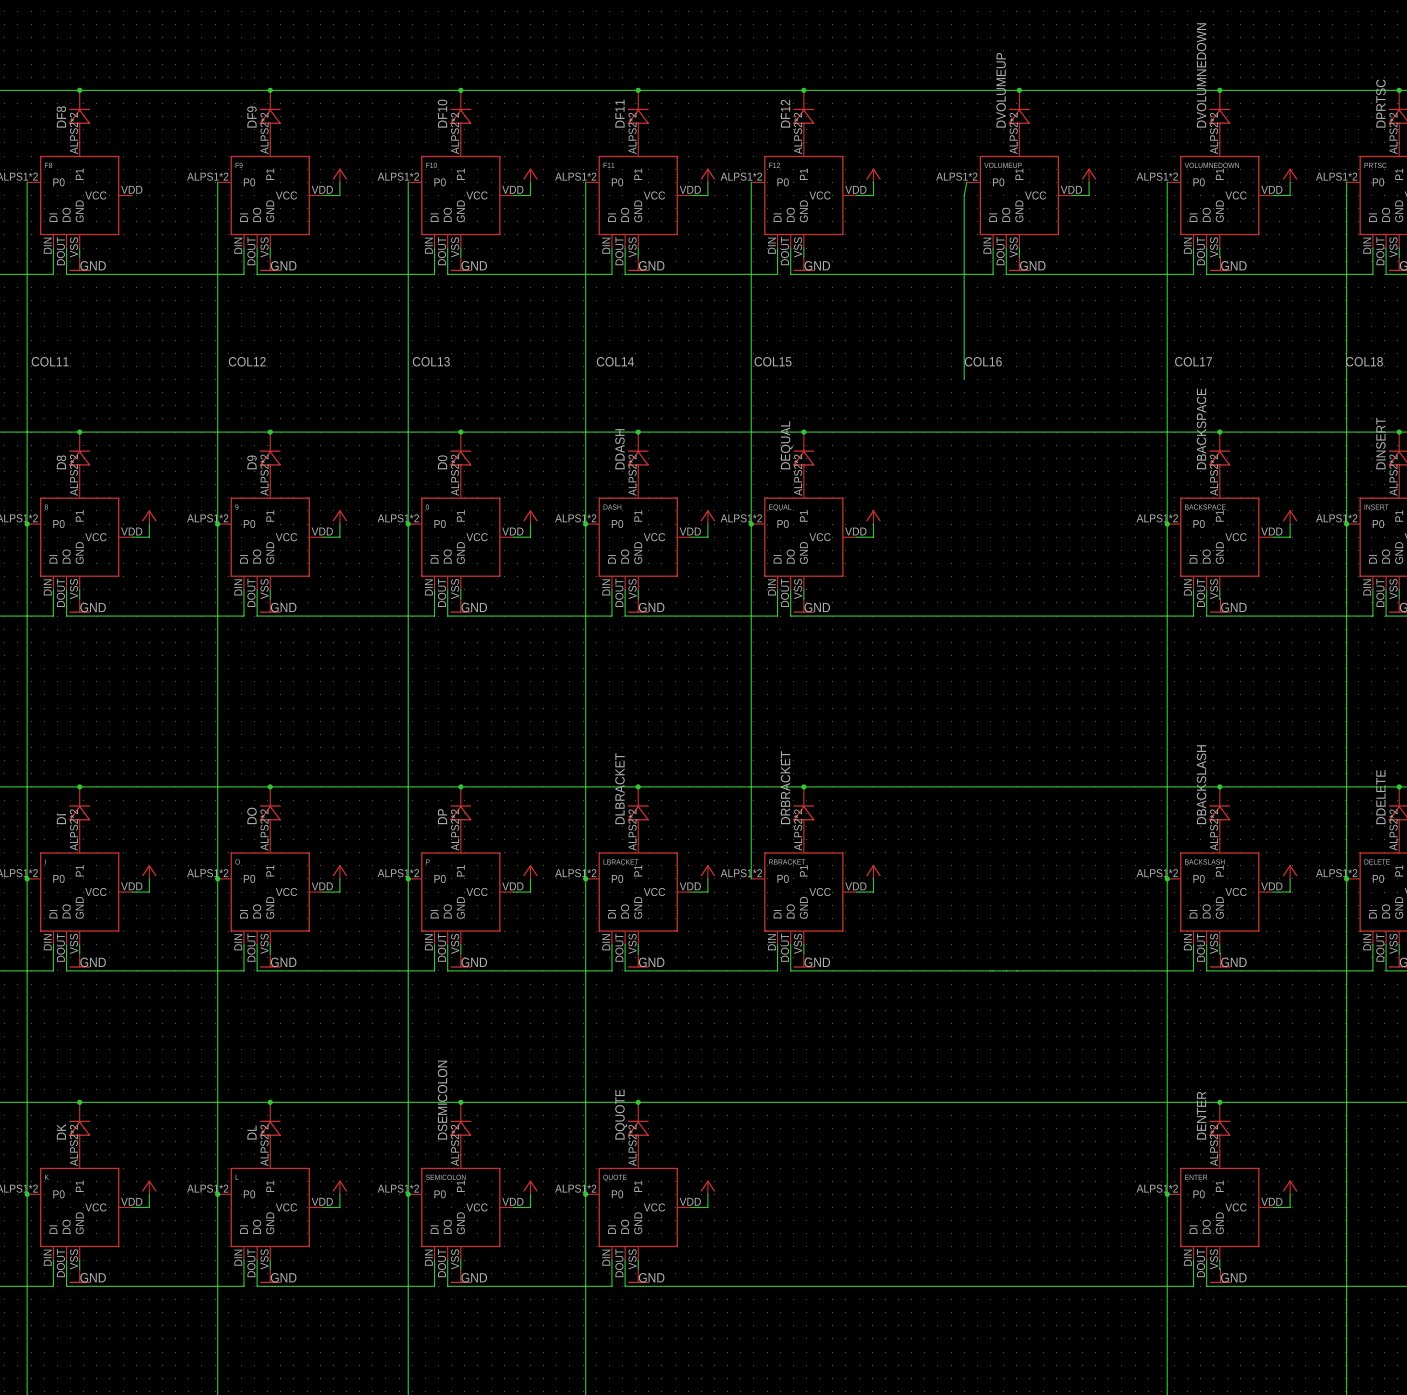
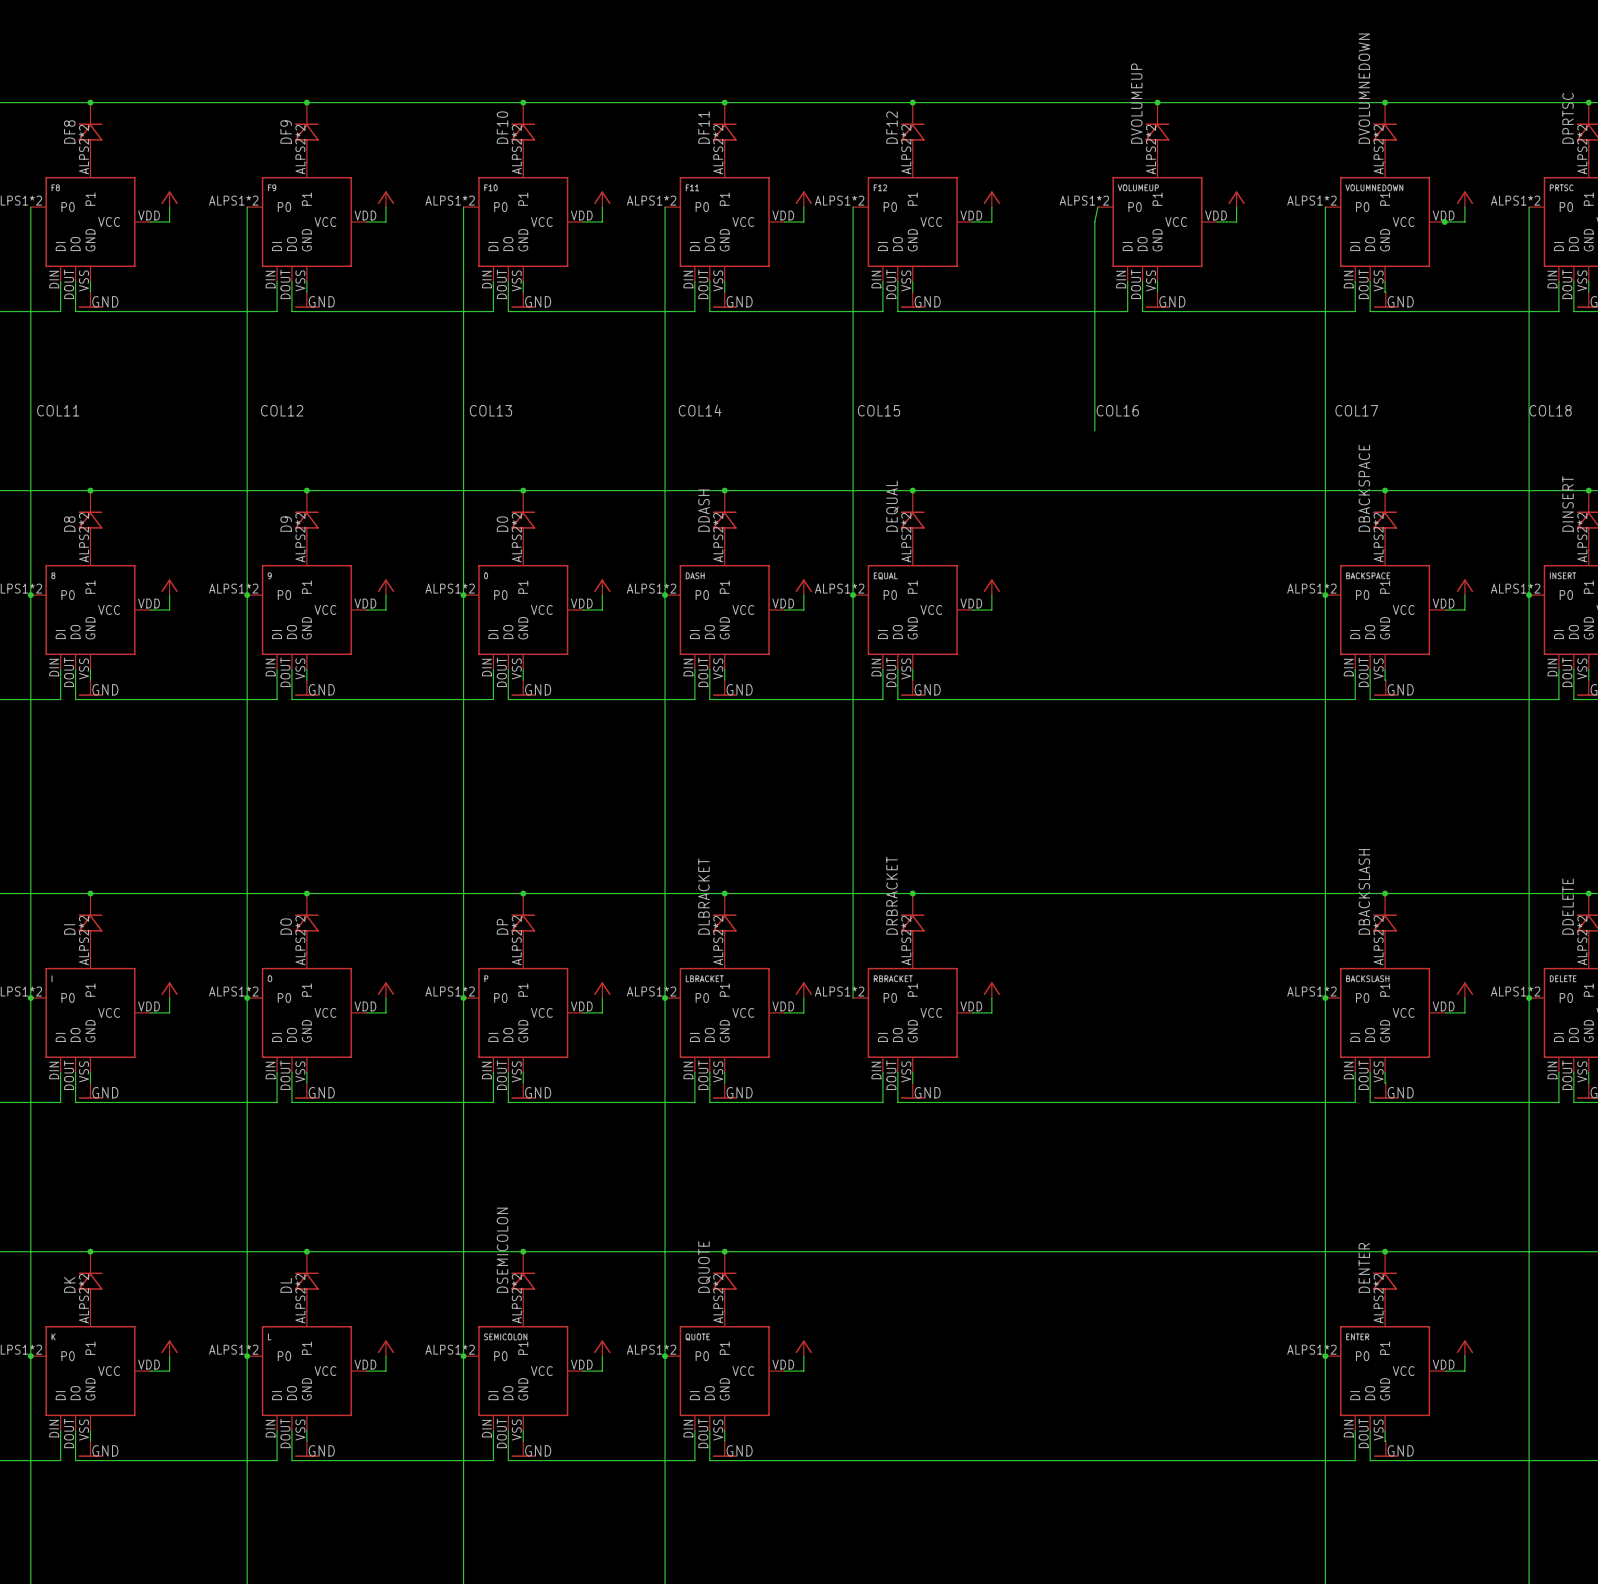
power symbol: none -> (169, 199)
wire: none -> (169, 207) (169, 221) (150, 221)
junction: none -> (1444, 221)

